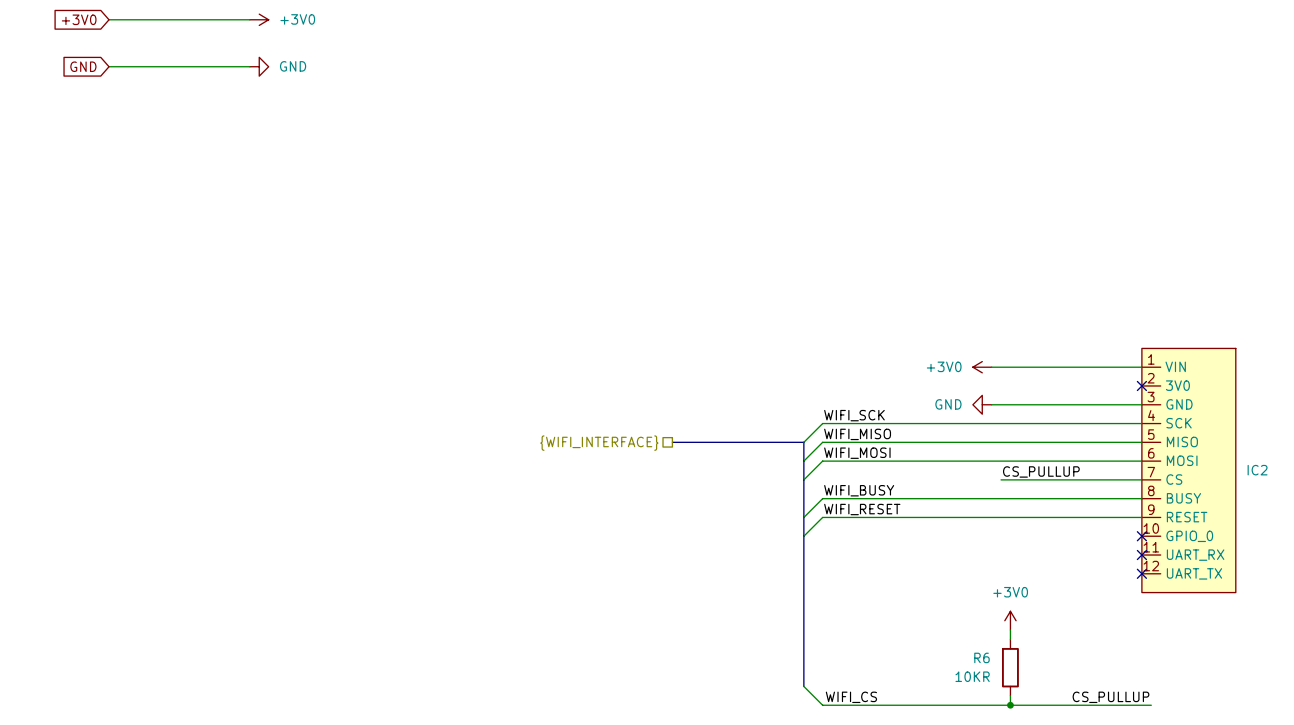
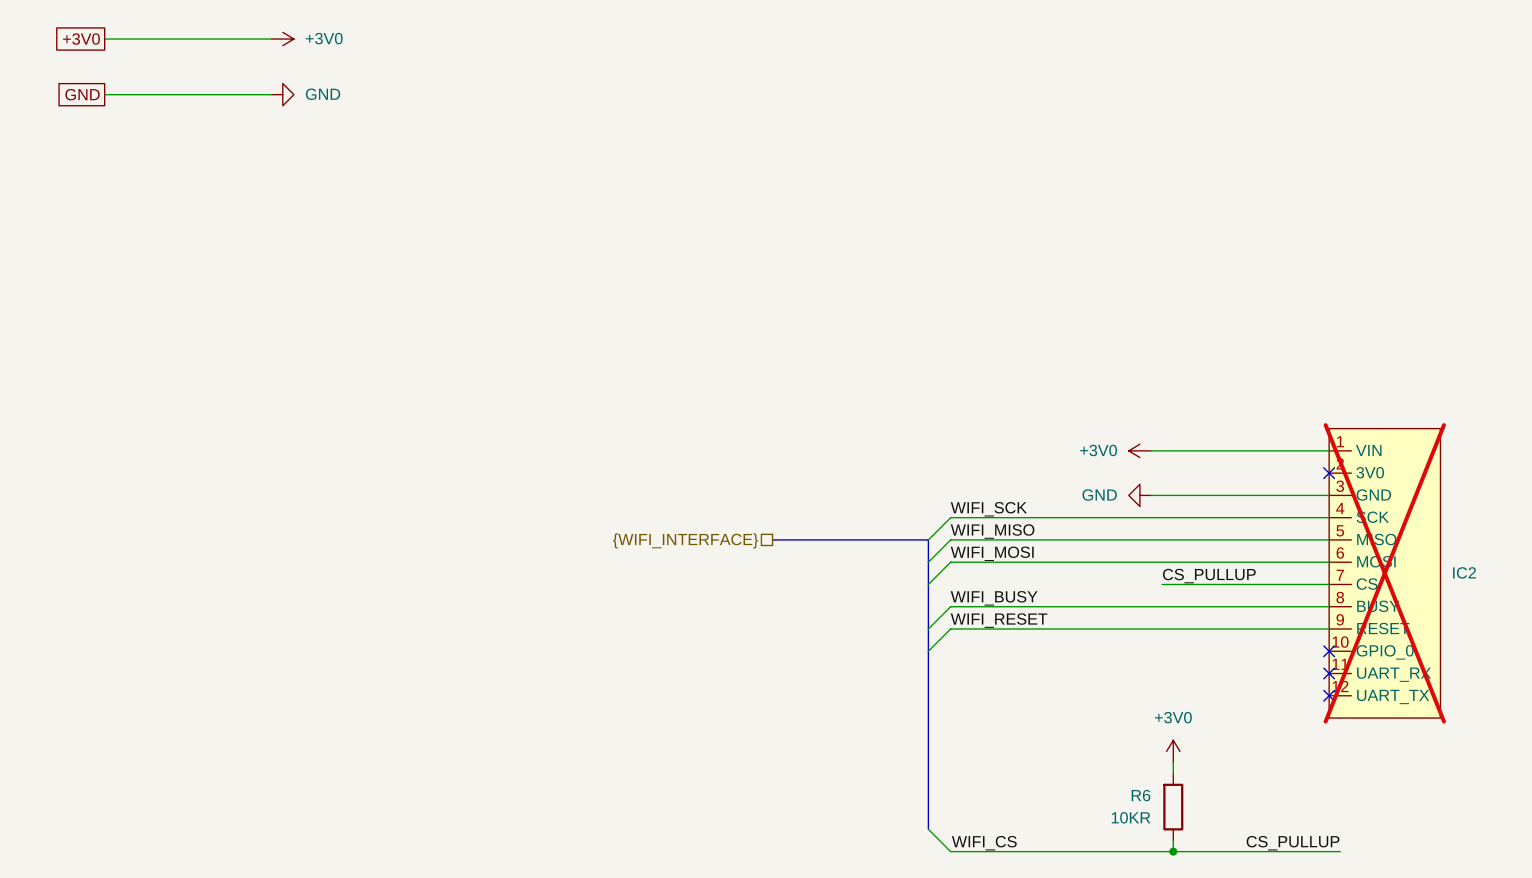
global label shape: input (79, 19) -> passive (81, 39)
global label shape: input (83, 66) -> passive (82, 94)
IC2 do-not-place cross: none -> (1384, 573)

